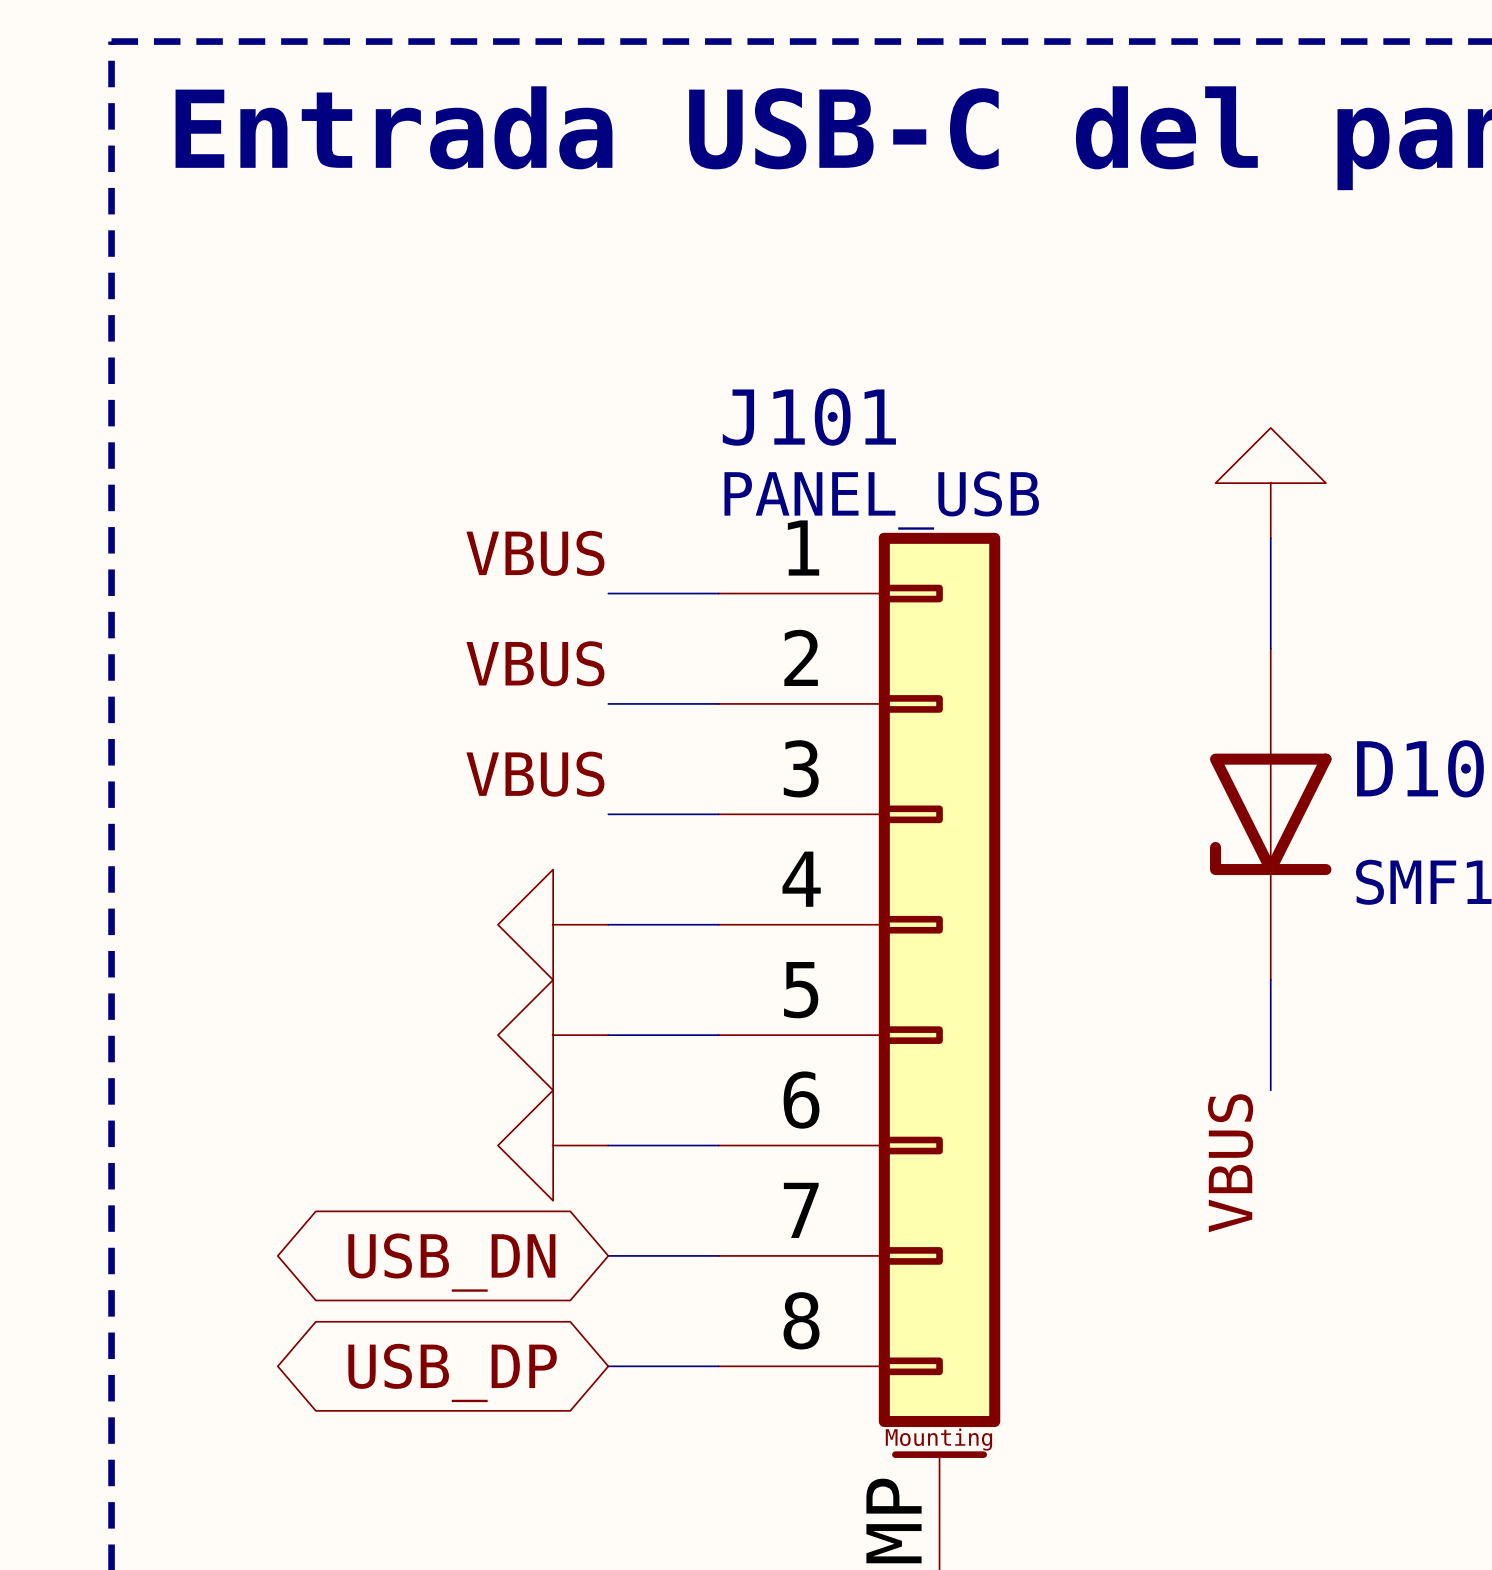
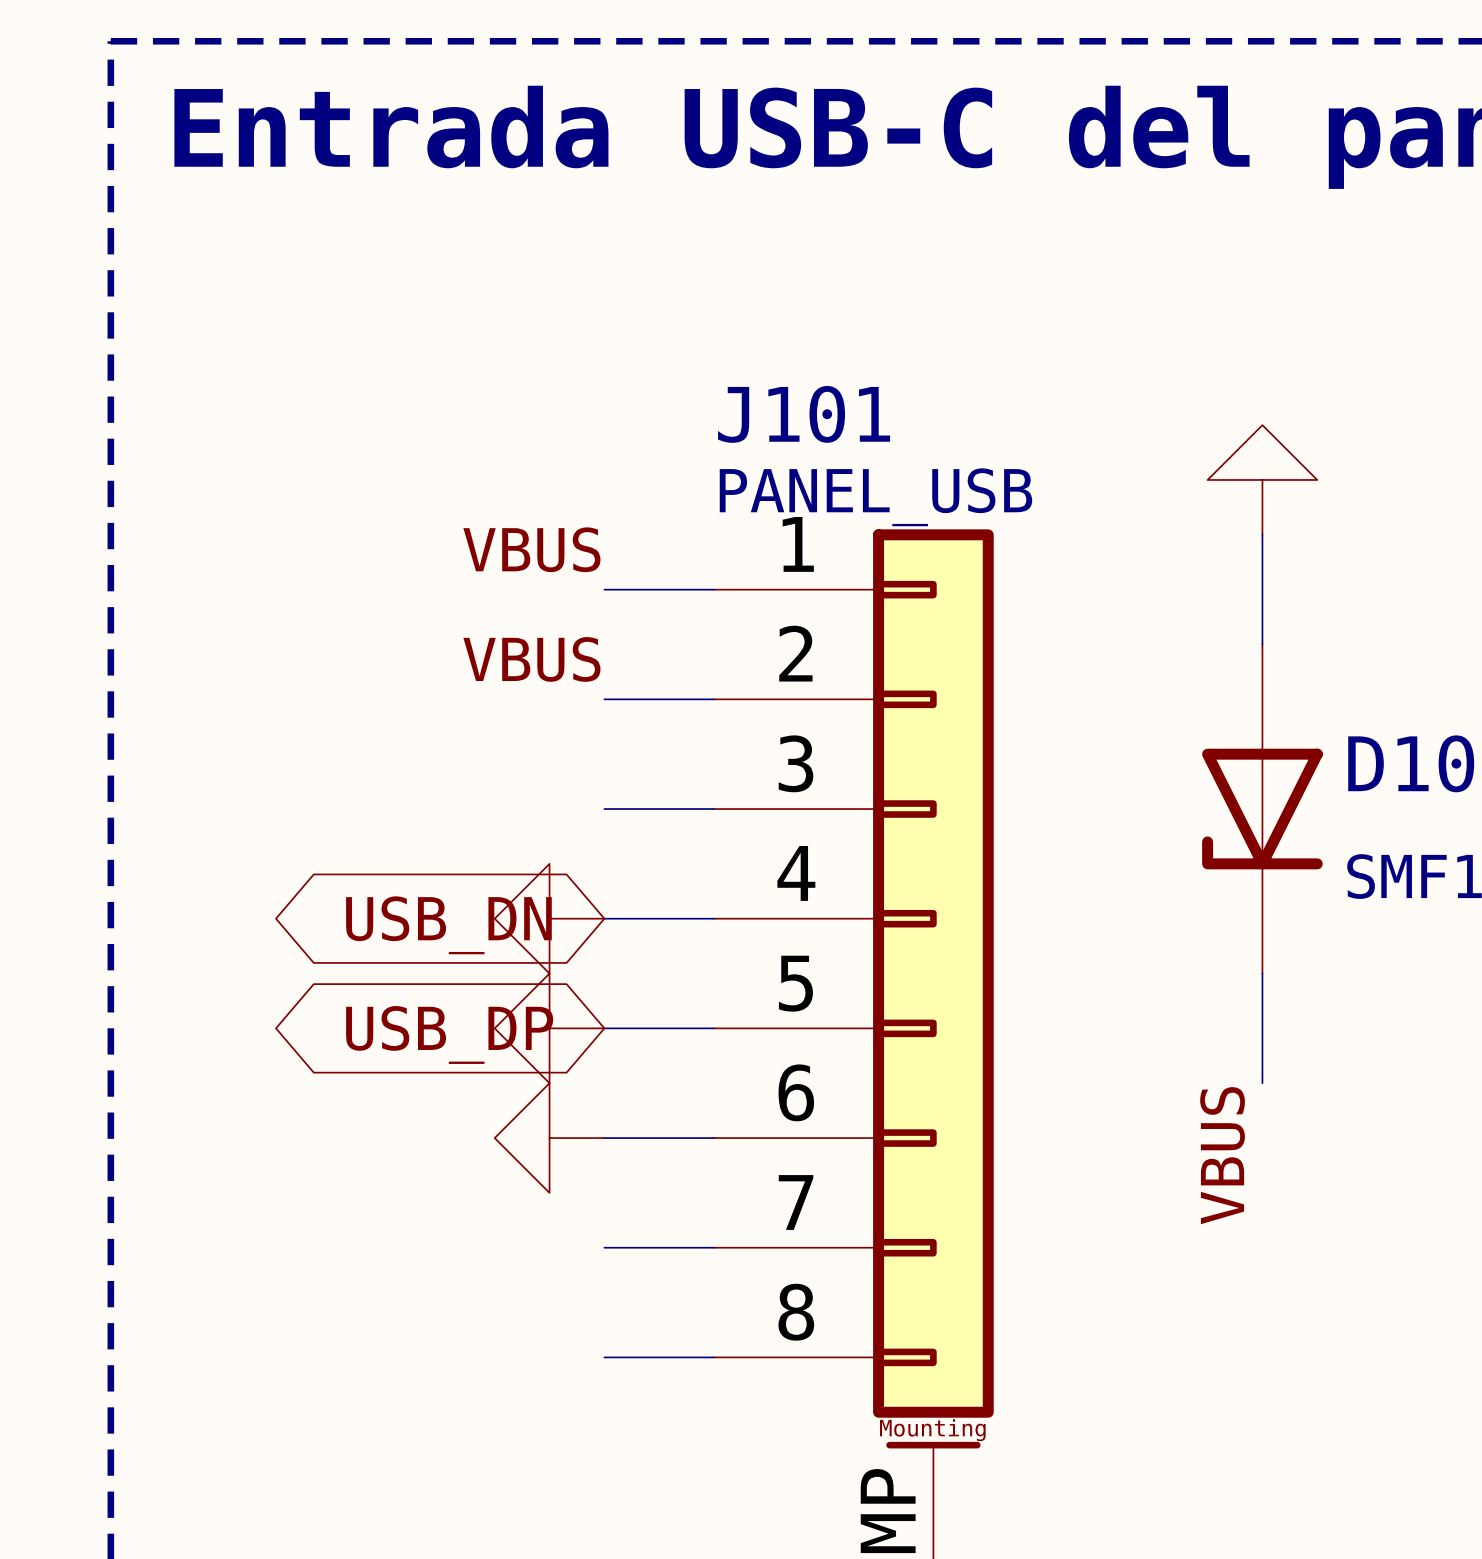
label: VBUS (535, 774) -> none
global label position: USB_DN (451, 1262) -> USB_DN (448, 925)
global label position: USB_DP (452, 1372) -> USB_DP (449, 1034)

